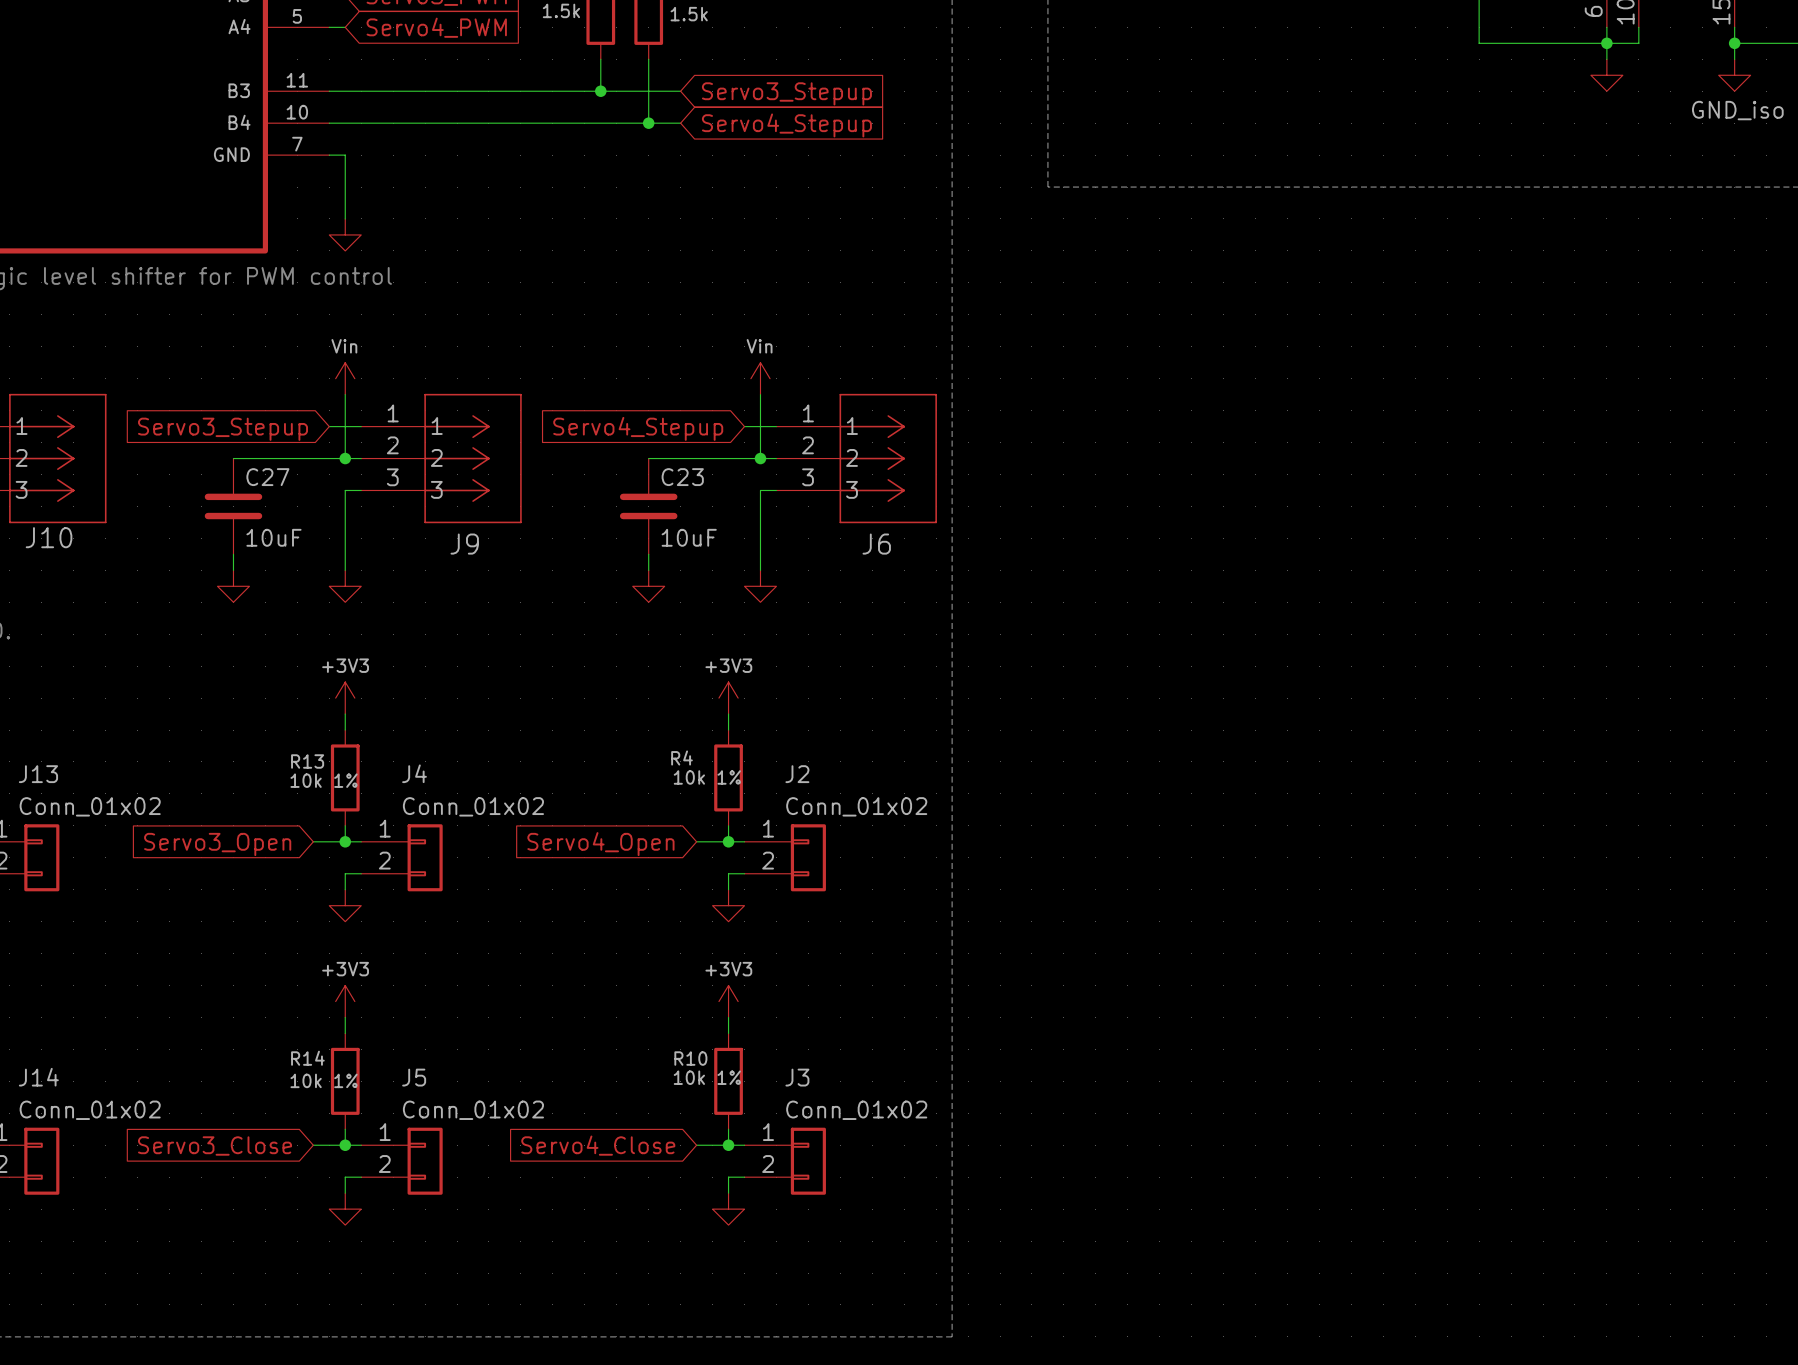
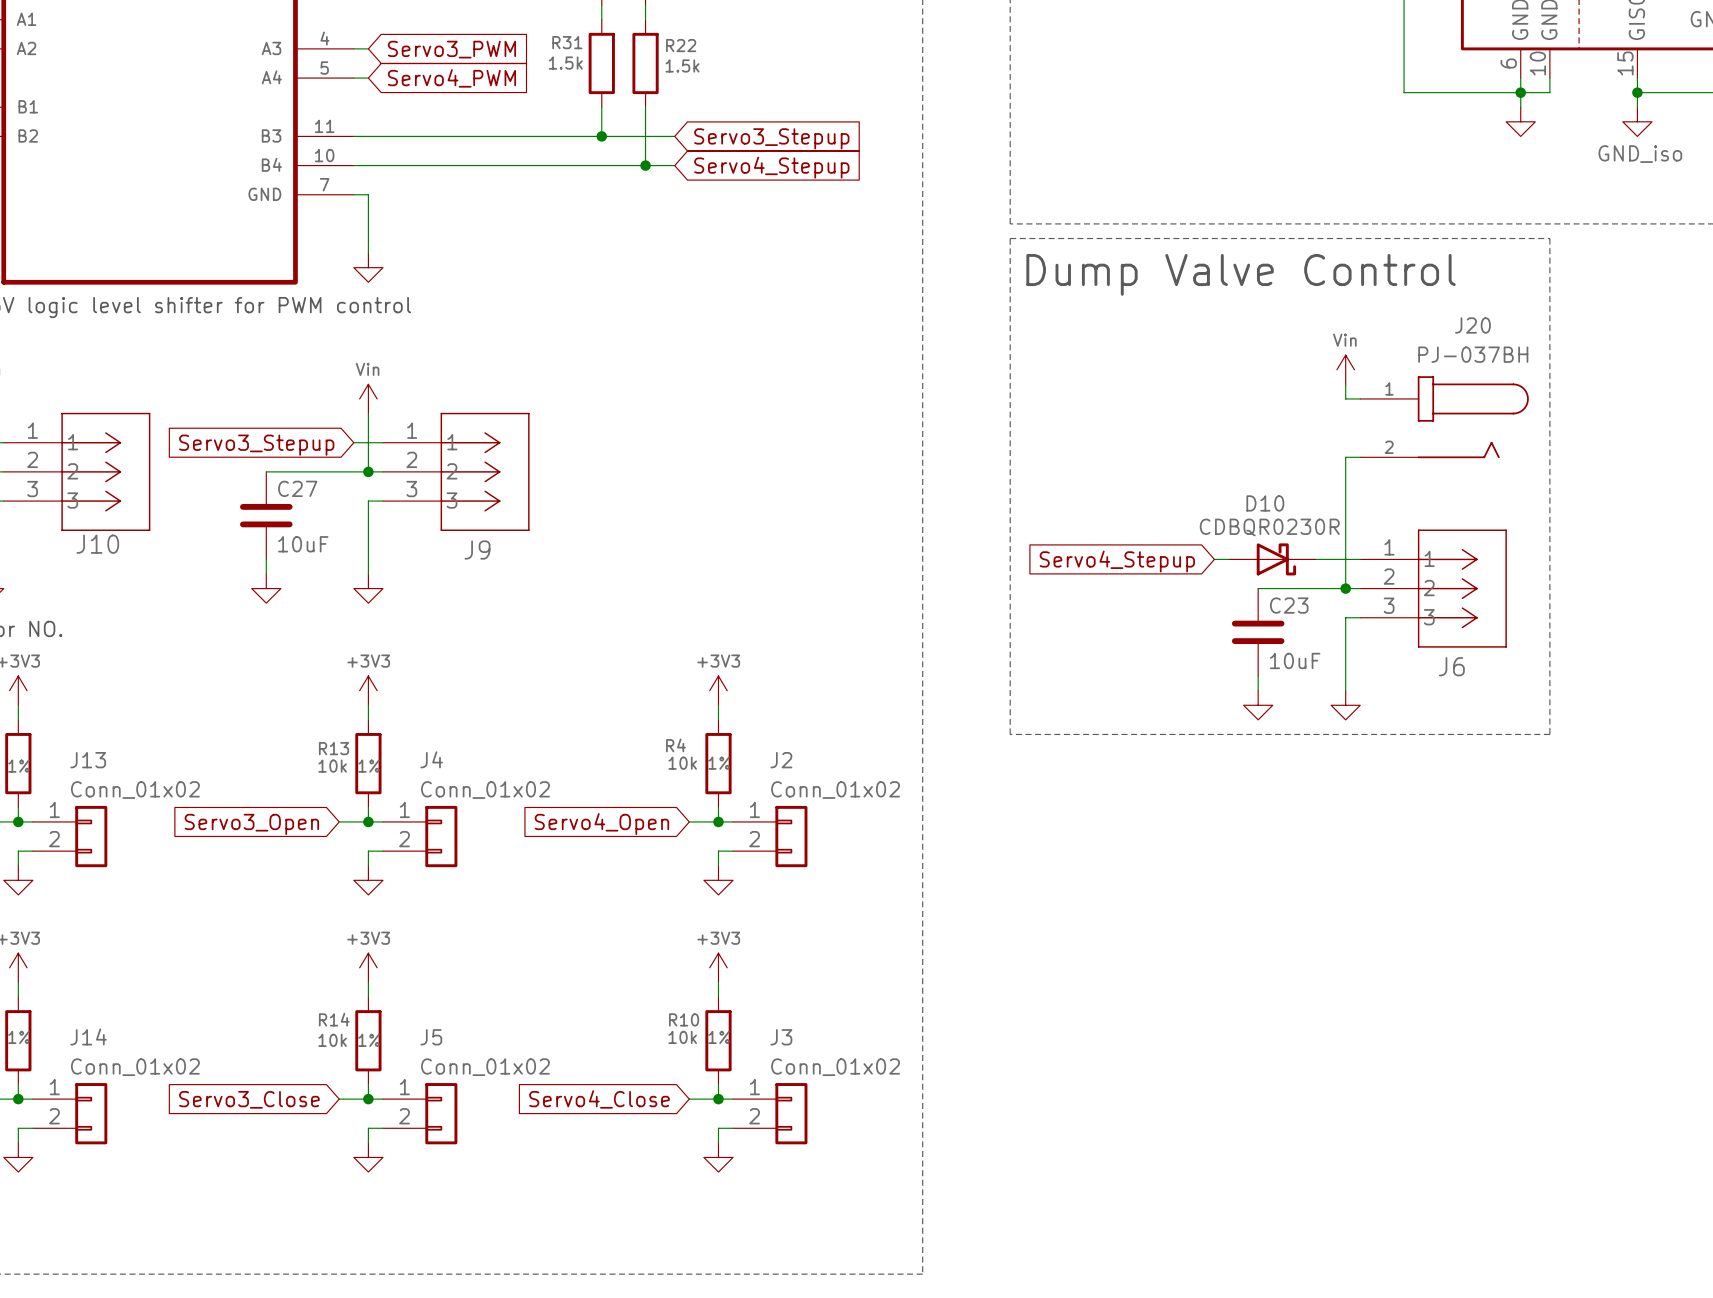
line: none -> (1010, 238) (1549, 238) (1549, 734) (1010, 734) (1010, 238)
text: none -> Dump Valve Control (1241, 274)
power symbol: none -> Vin (1345, 369)
wire: none -> (1345, 384) (1345, 398) (1360, 398)
power symbol: Vin (760, 378) -> none
wire: (760, 394) (760, 458) -> none
J20: none -> PJ-037BH (1444, 417)
wire: (744, 426) (776, 426) -> none
global label: Servo4_Stepup (638, 428) -> none
wire: none -> (1360, 457) (1345, 457) (1345, 588)
wire: (648, 458) (776, 458) -> none
junction: (760, 458) -> none
J6 position: (856, 458) -> (1433, 588)
wire: (776, 490) (760, 490) (760, 570) -> none
C23 position: (648, 506) -> (1258, 632)
wire: (648, 554) (648, 570) -> none
wire: none -> (1214, 559) (1229, 559)
D10: none -> CDBQR0230R (1272, 559)
wire: none -> (1316, 559) (1360, 559)
global label: none -> Servo4_Stepup (1117, 561)
power symbol: (648, 586) -> none
power symbol: (760, 586) -> none
wire: none -> (1258, 588) (1360, 588)
junction: none -> (1345, 588)
wire: none -> (1360, 617) (1345, 617) (1345, 690)
wire: none -> (1258, 676) (1258, 690)
power symbol: none -> (1258, 705)
power symbol: none -> (1345, 705)

